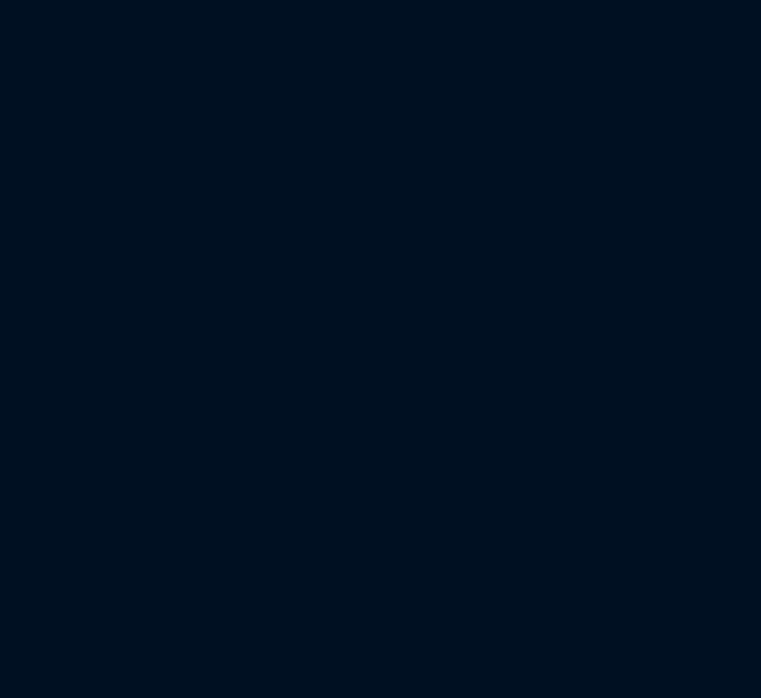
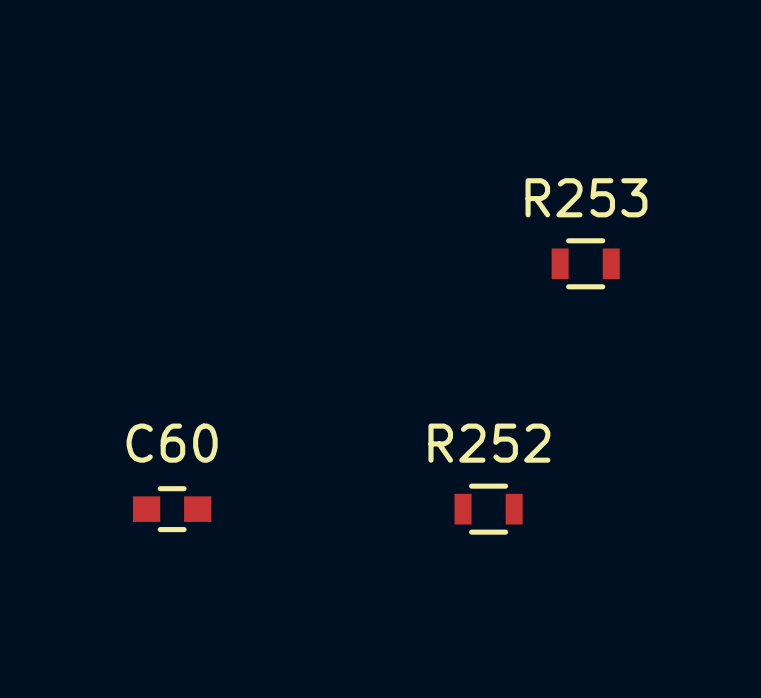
R253: none -> (585, 263)
C60: none -> (172, 509)
R252: none -> (488, 509)

